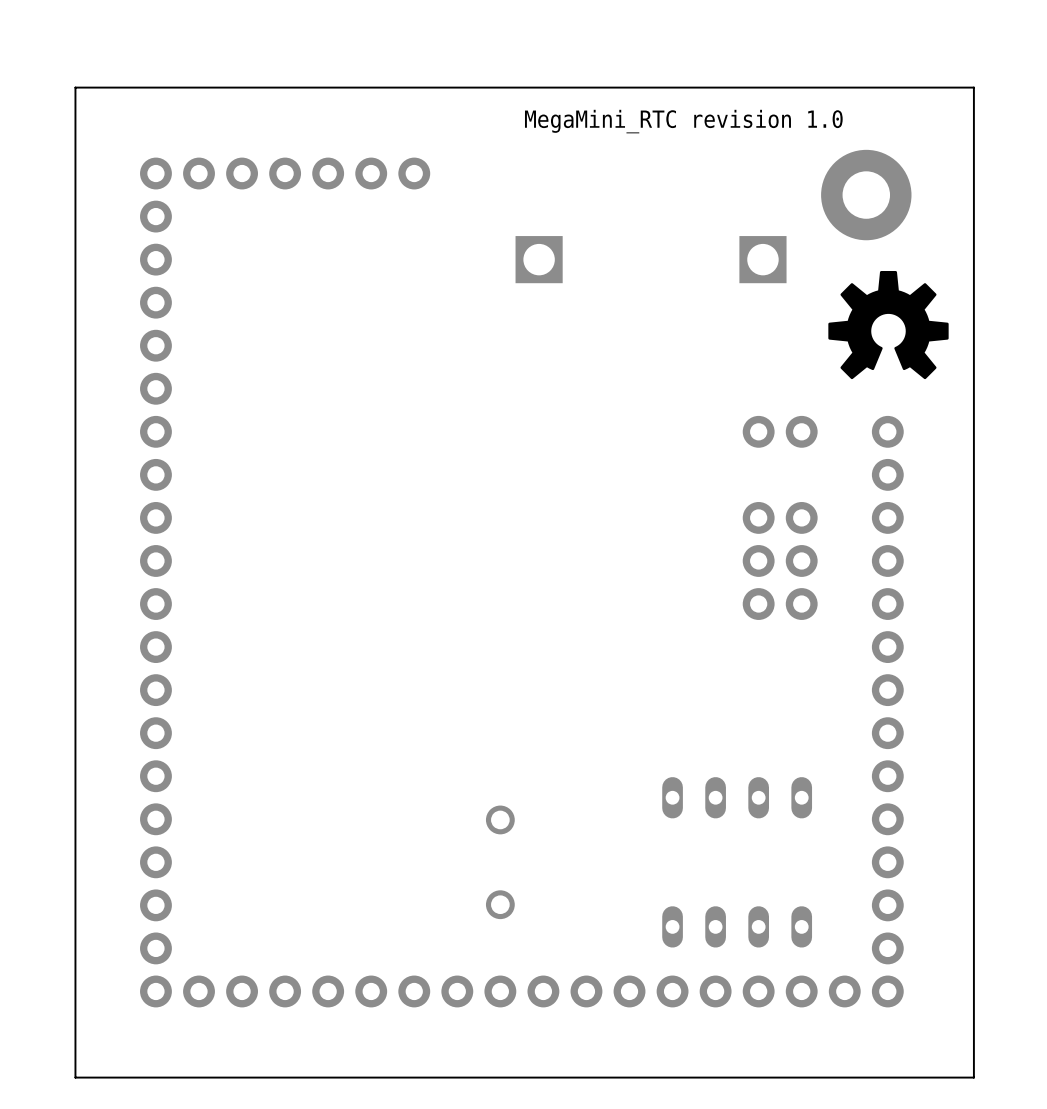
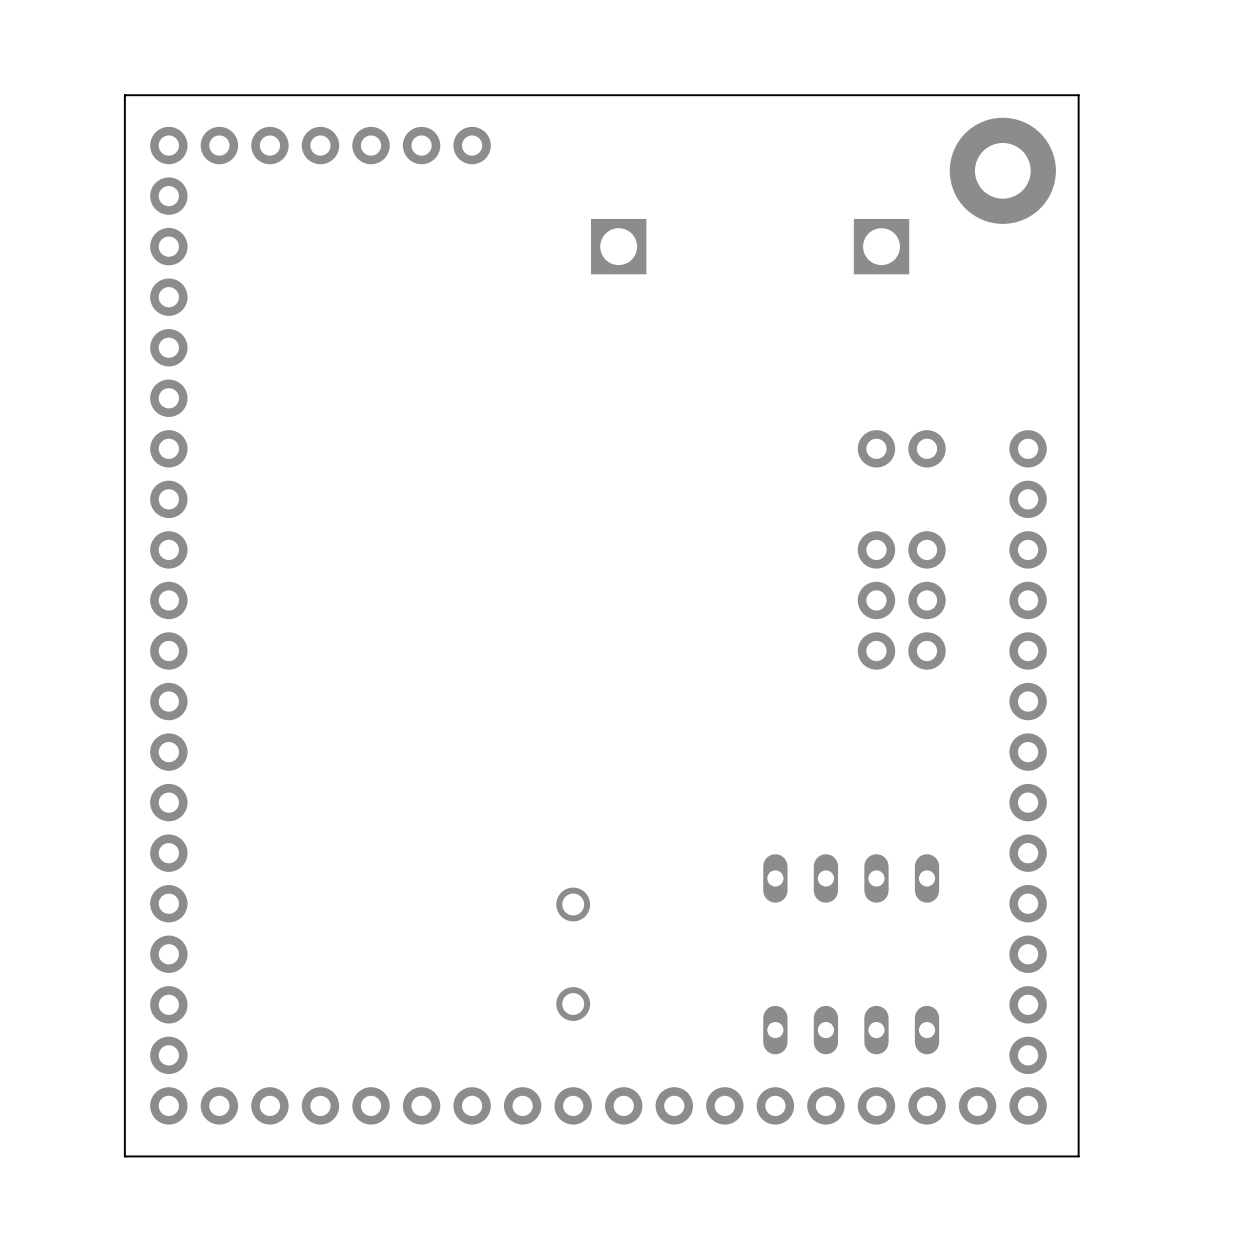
board edge: (973, 87) (75, 87) (75, 1077) (973, 1077) (973, 87) -> (1078, 95) (1078, 1156) (124, 1156) (124, 95) (1078, 95)
text: MegaMini_RTC revision 1.0 (683, 121) -> none
drawing: [828, 271, 949, 380] -> none

